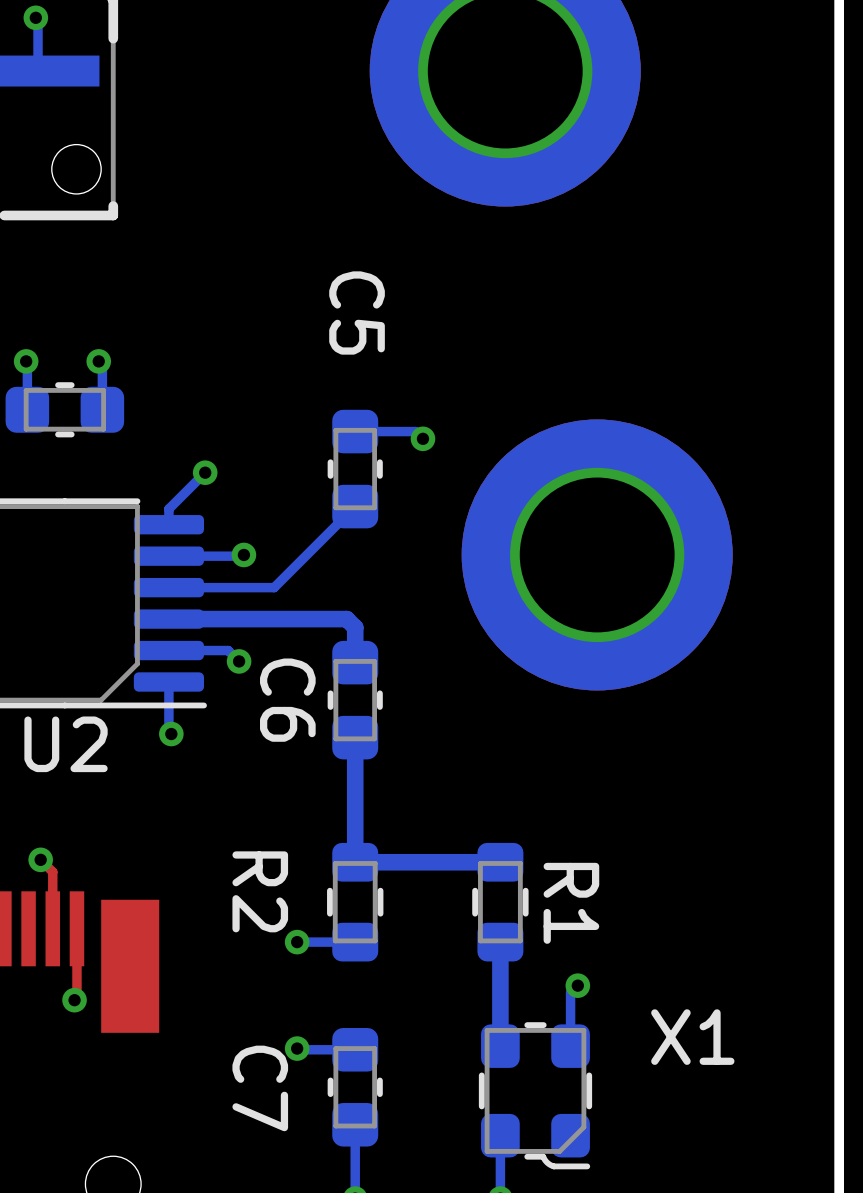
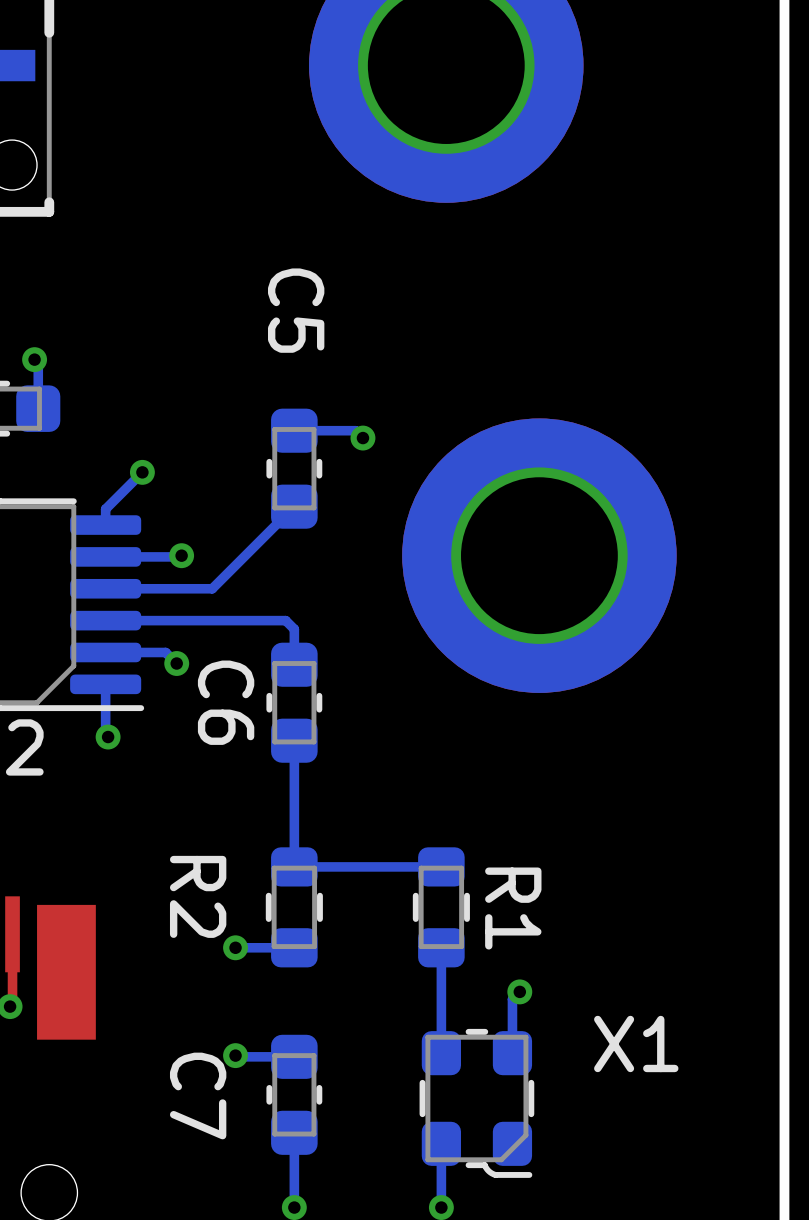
bottom track width: thick (168, 619) (346, 619) (355, 627) (355, 662) -> thin (105, 620) (285, 620) (294, 629) (294, 664)
bottom track width: thick (355, 737) (355, 862) (500, 862) -> thin (294, 740) (294, 866) (441, 866)
bottom track width: thick (500, 942) (500, 1046) -> thin (441, 947) (441, 1053)

